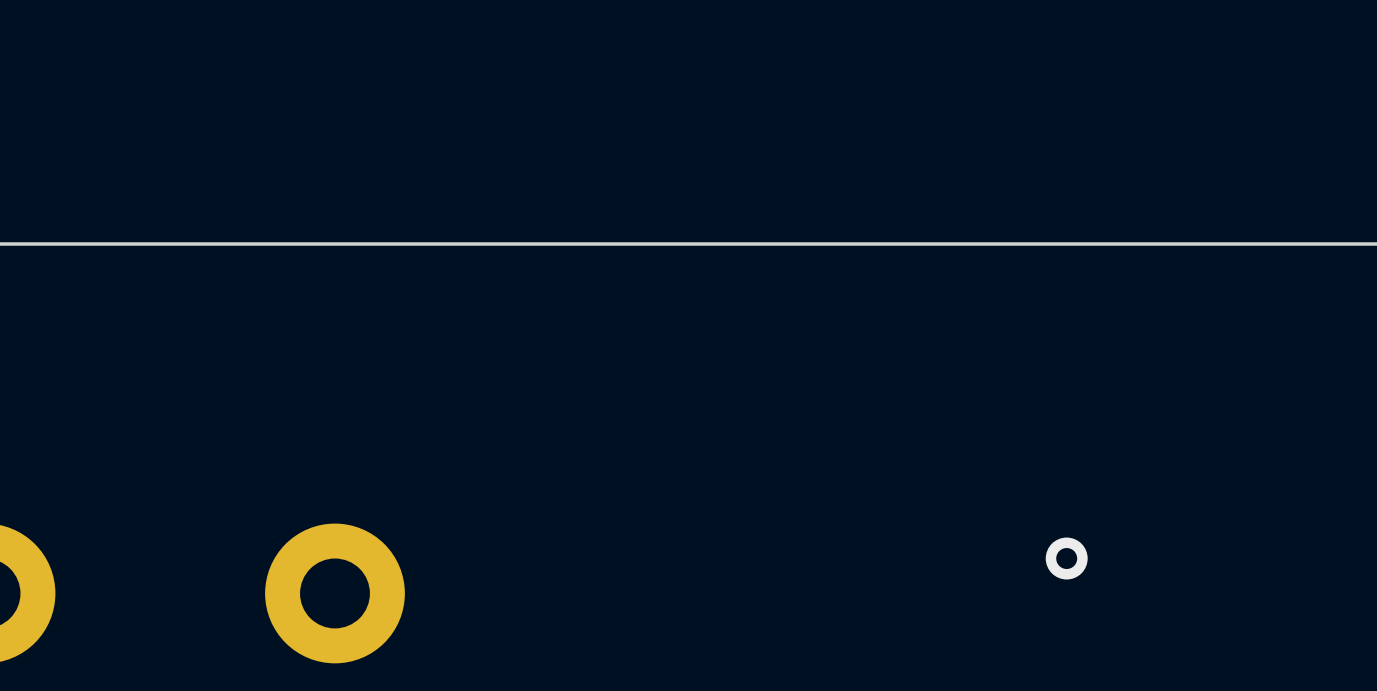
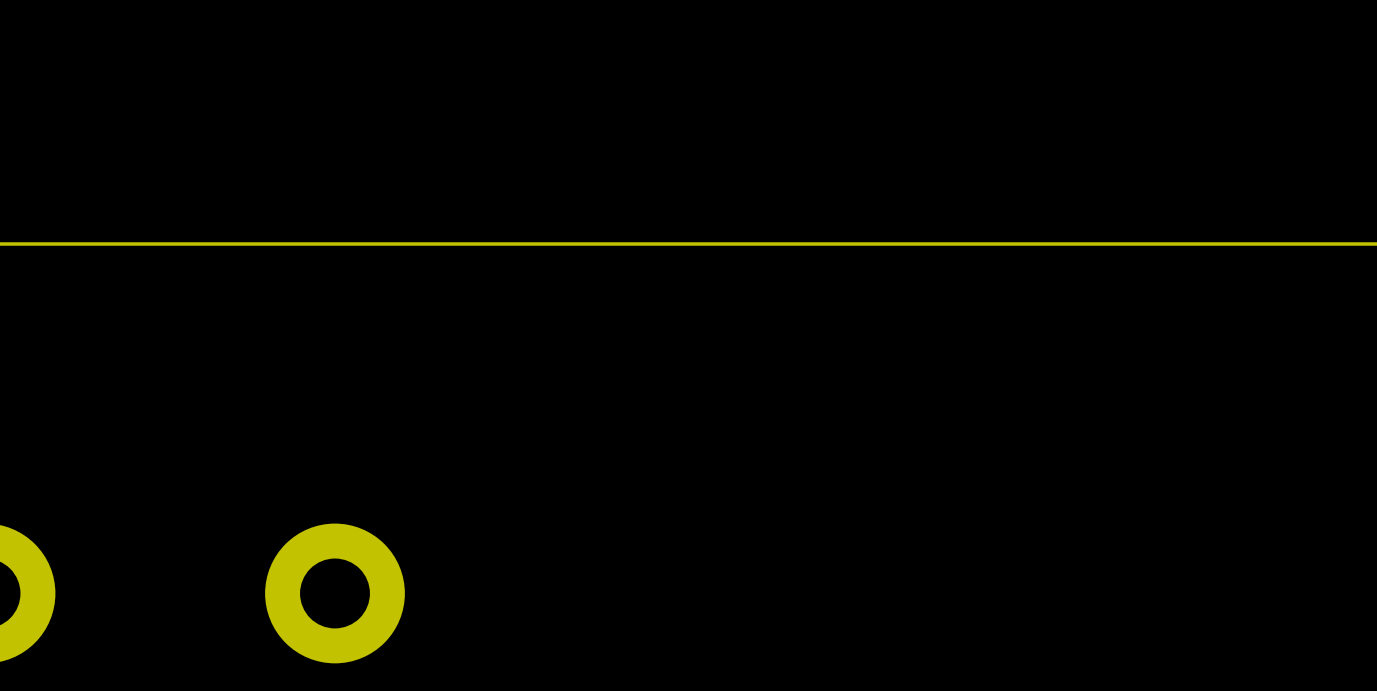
via: (1066, 558) -> none

